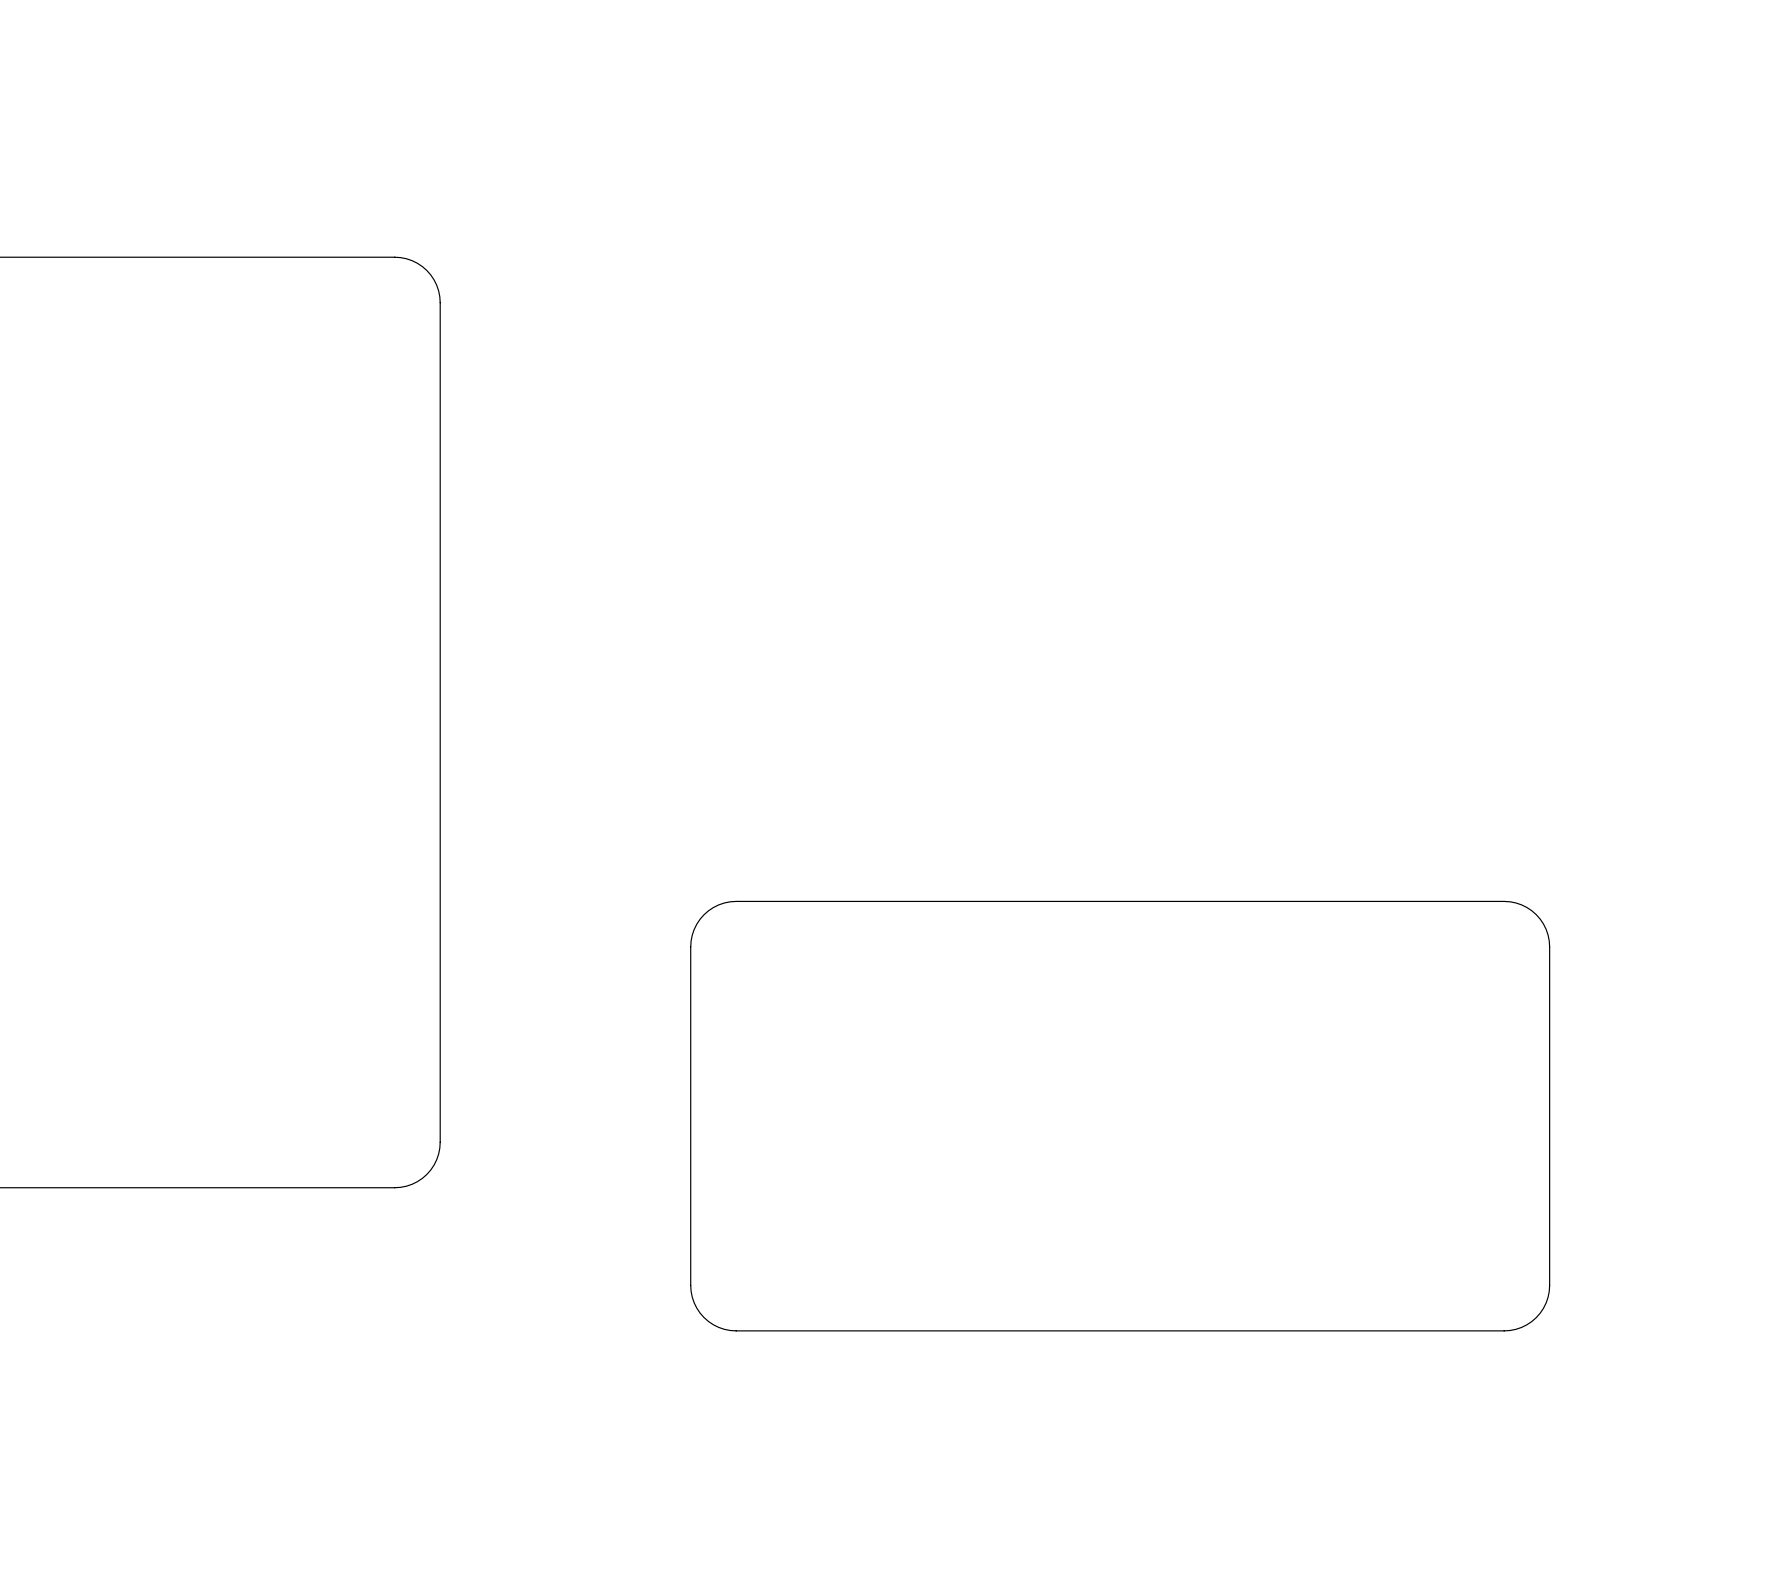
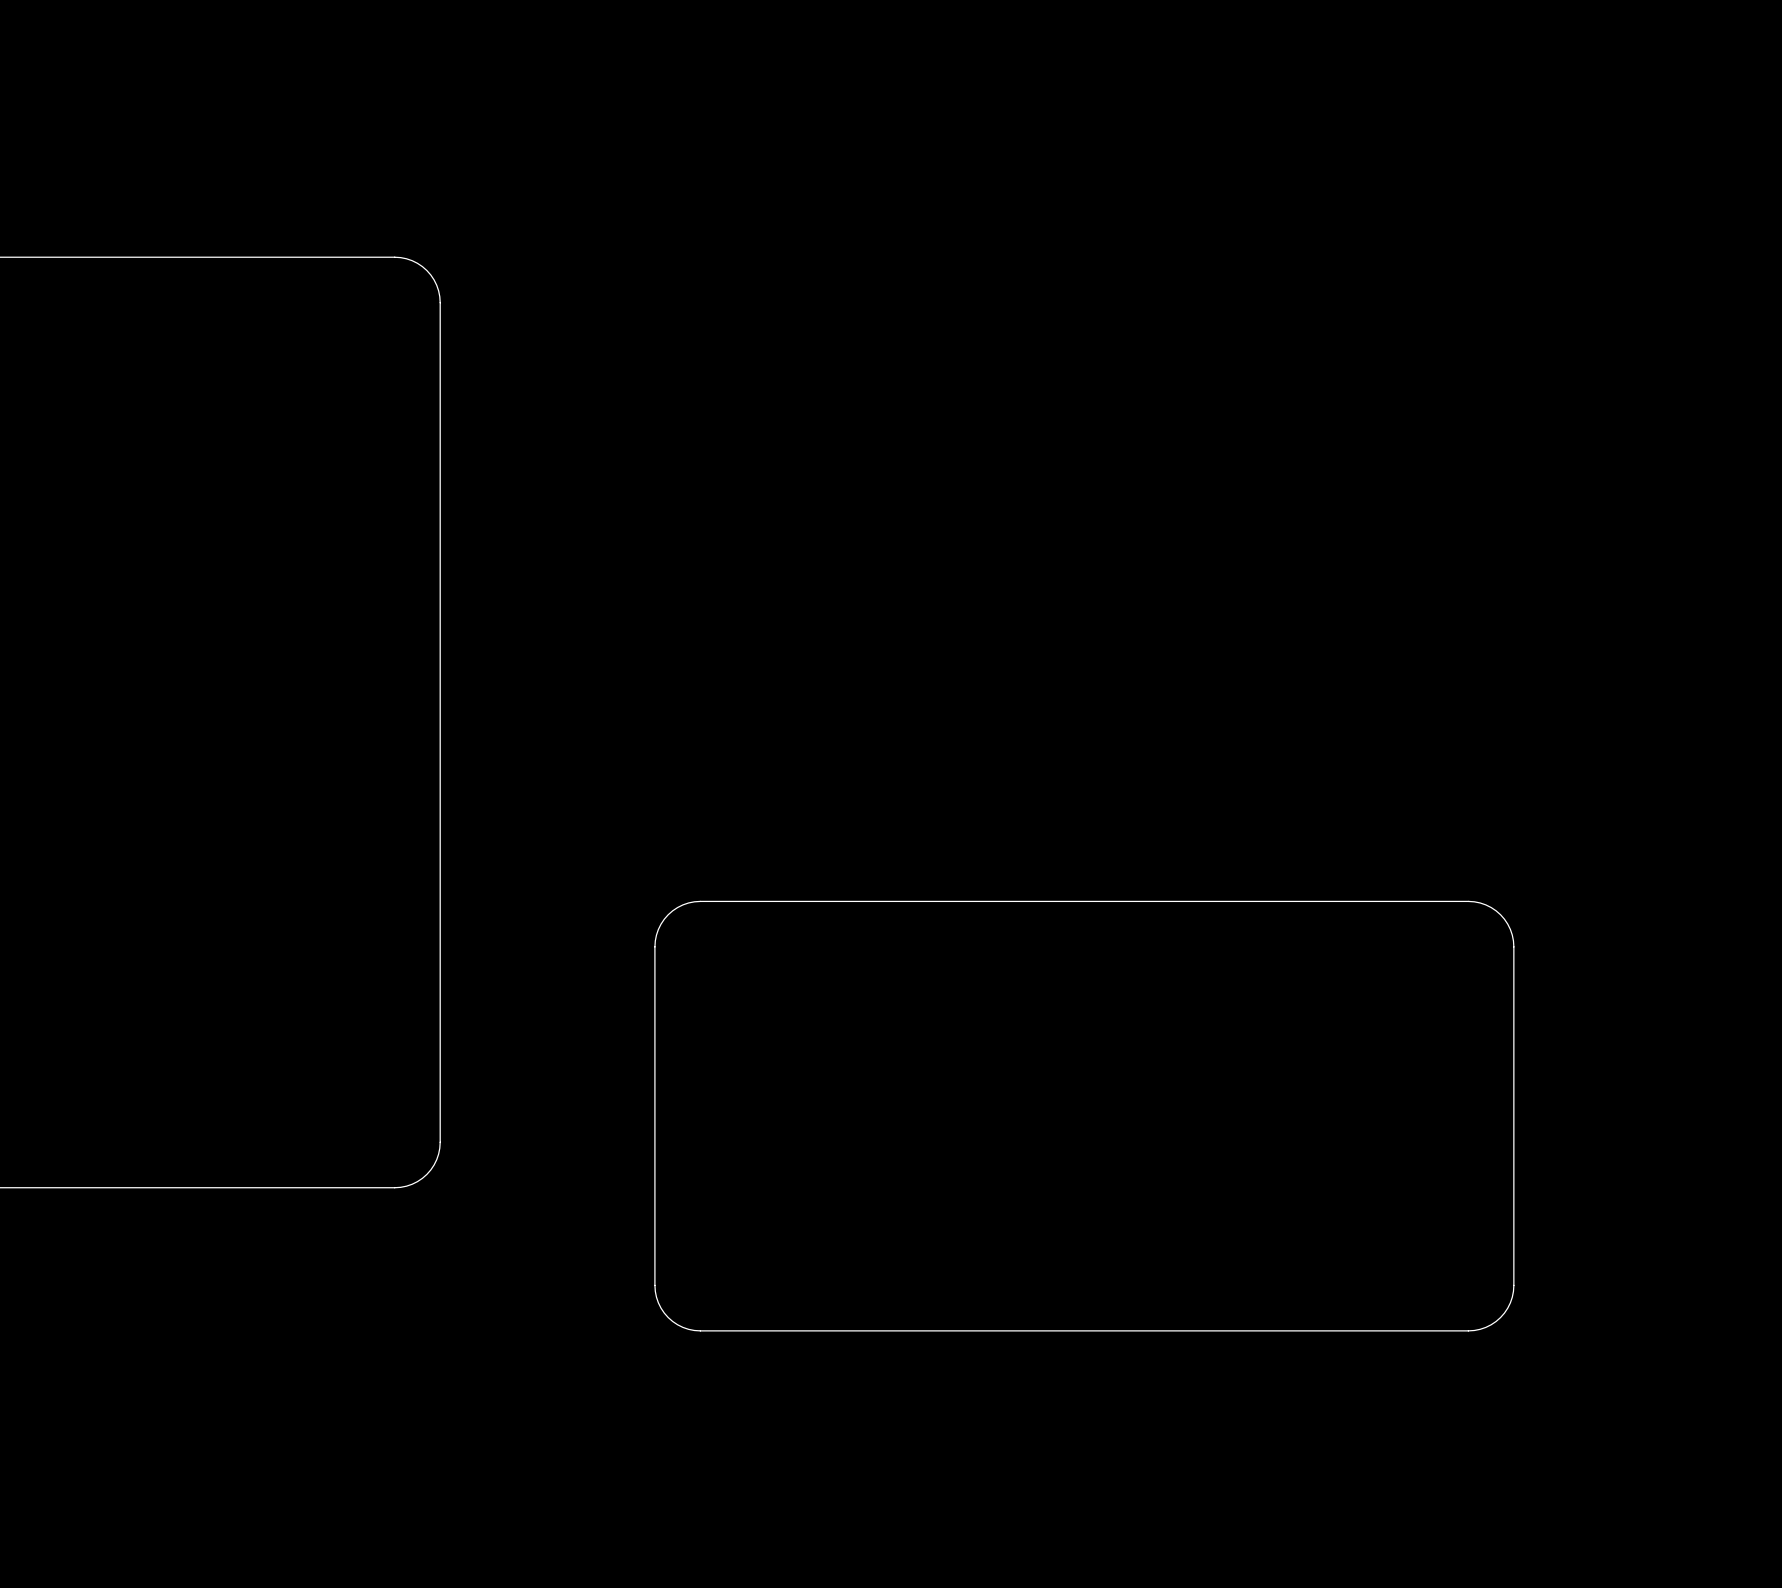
board edge: (736, 901) (718, 904) (704, 914) (694, 929) (690, 946) (691, 1291) (696, 1308) (708, 1321) (724, 1329) (736, 1330) -> (736, 901) (694, 901) (677, 907) (668, 914) (661, 924) (656, 935) (654, 946) (656, 1297) (664, 1313) (672, 1321) (682, 1327) (700, 1330) (736, 1330)
board edge: (1468, 901) (1510, 901) (1526, 907) (1536, 914) (1543, 924) (1548, 935) (1549, 946) (1548, 1297) (1540, 1313) (1531, 1321) (1521, 1327) (1504, 1330) (1468, 1330) -> (1468, 901) (1485, 904) (1500, 914) (1510, 929) (1513, 946) (1513, 1291) (1507, 1308) (1496, 1321) (1480, 1329) (1468, 1330)

